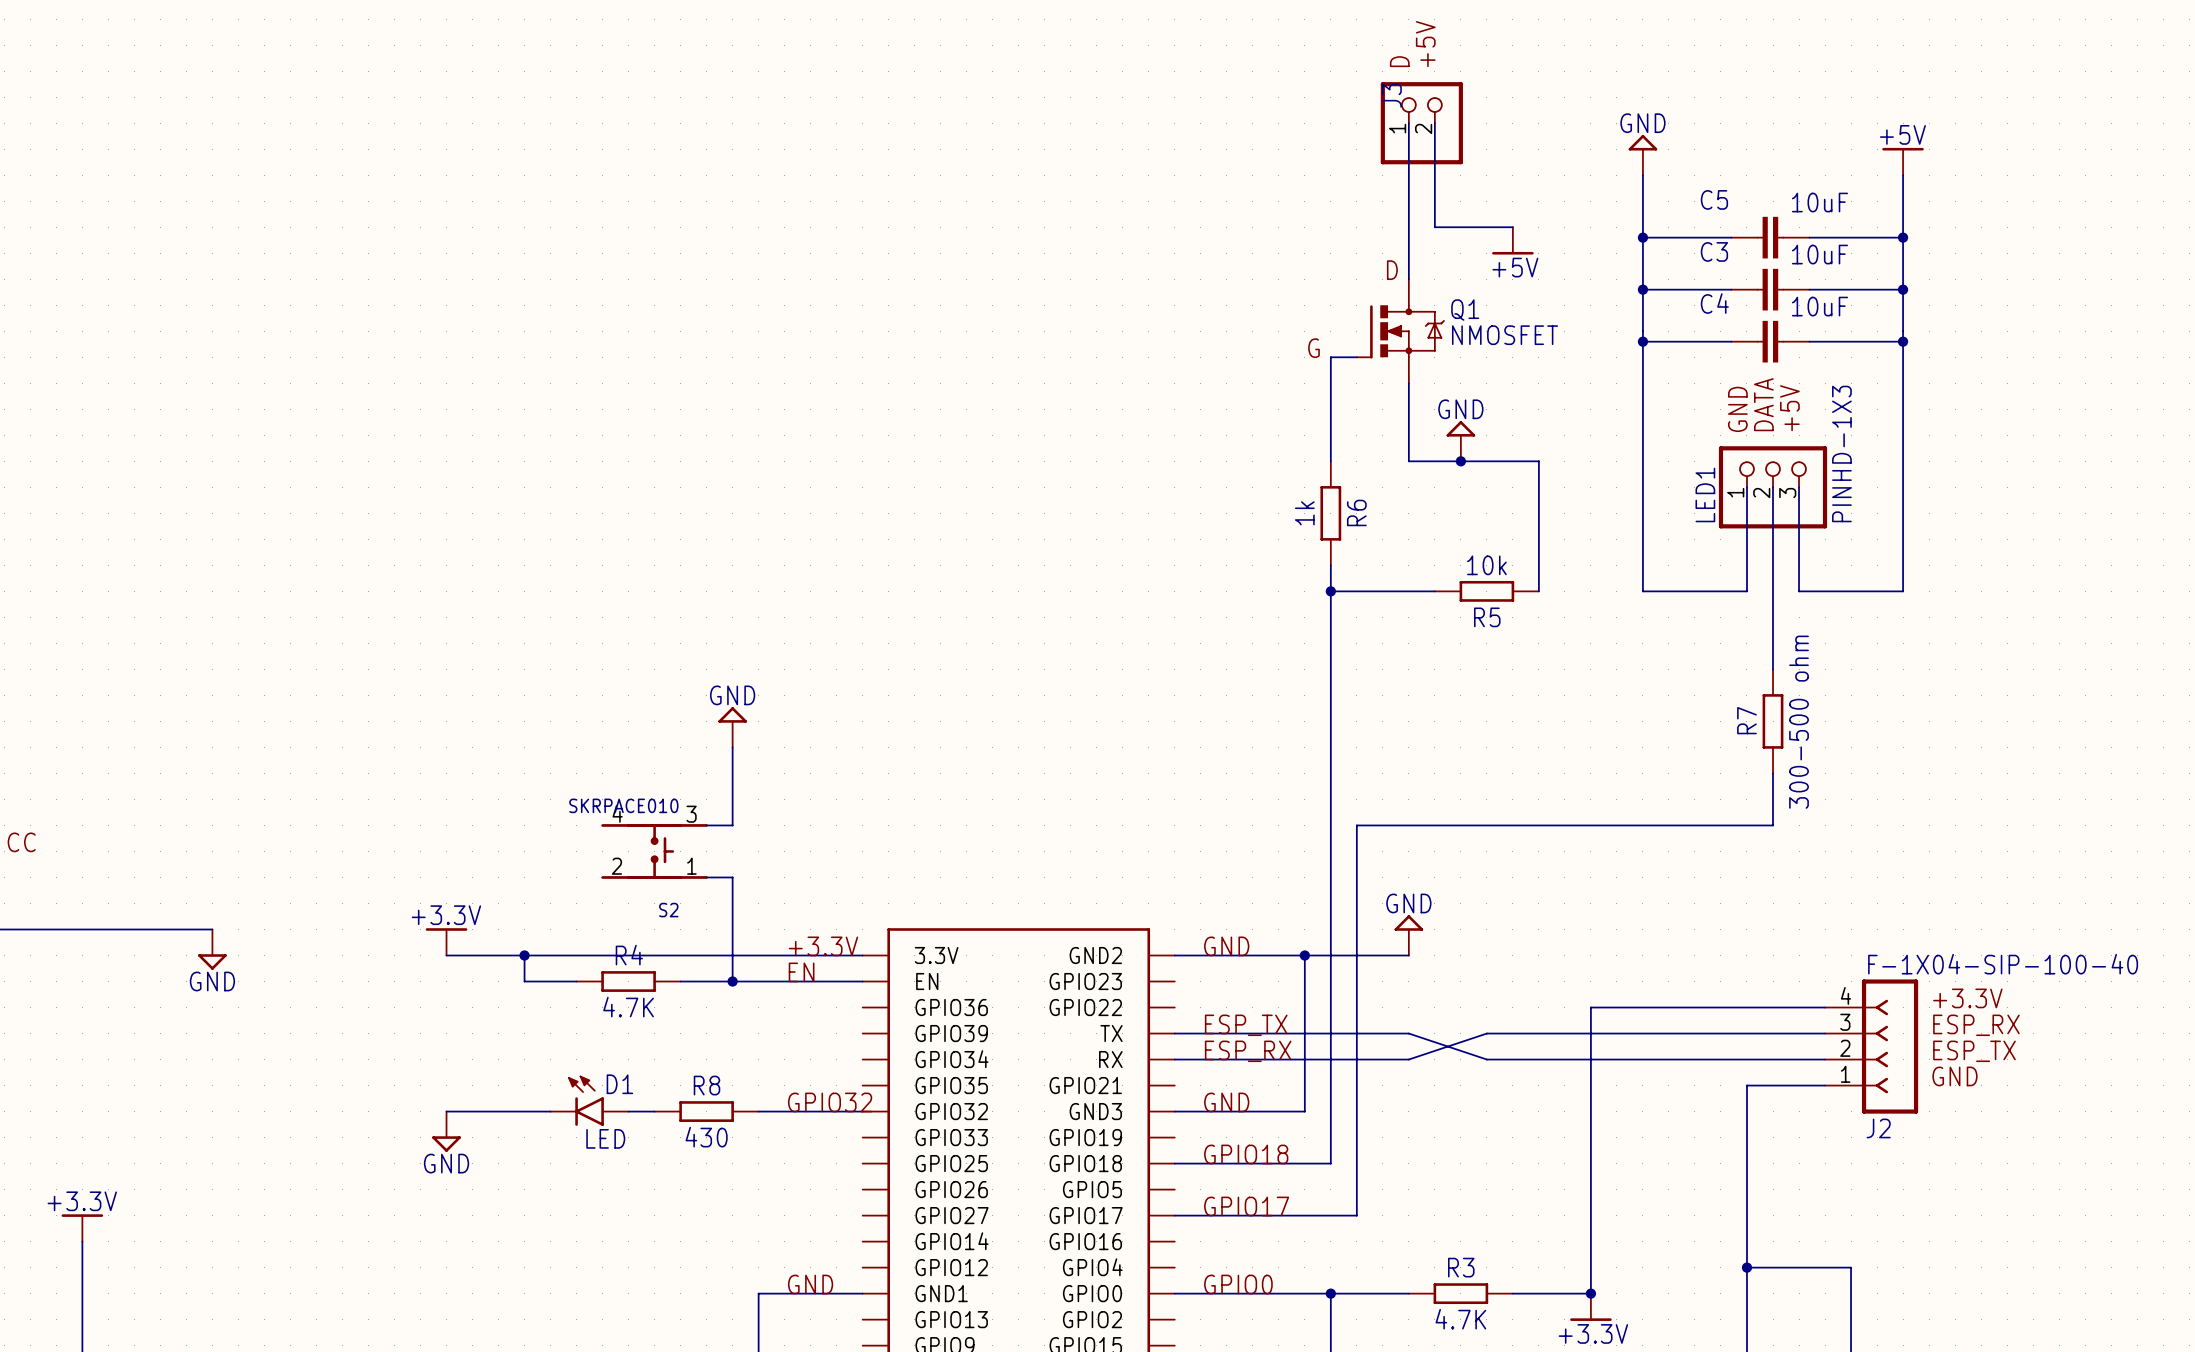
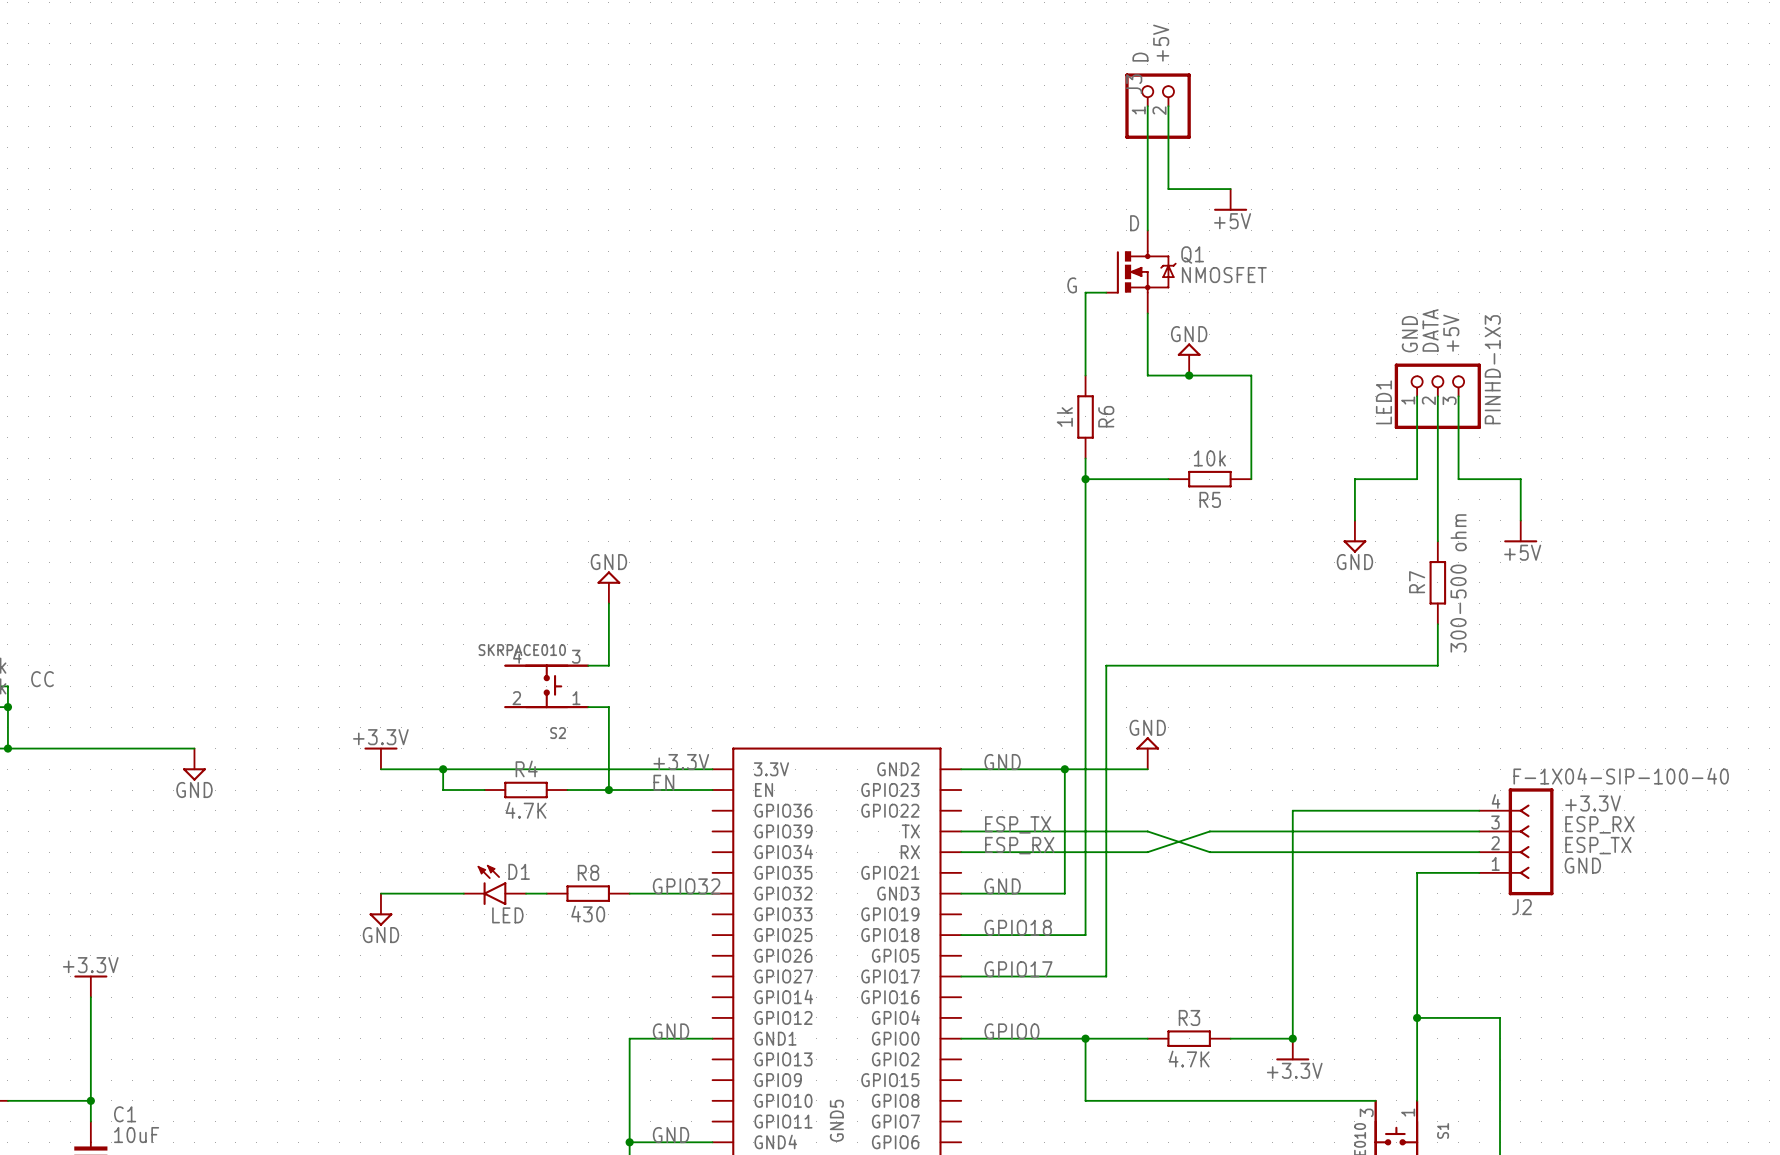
power symbol: GND (1642, 155) -> none
power symbol: +5V (1903, 161) -> none
wire: (1642, 175) (1642, 591) (1668, 591) -> (1354, 520) (1354, 479)
wire: (1903, 175) (1903, 591) (1877, 591) -> (1520, 520) (1520, 479)
wire: (1642, 237) (1731, 237) -> none
junction: (1642, 237) -> none
C5: 10uF (1770, 237) -> none
wire: (1809, 237) (1903, 237) -> none
junction: (1903, 237) -> none
wire: (1642, 289) (1731, 289) -> none
junction: (1642, 289) -> none
C3: 10uF (1770, 289) -> none
wire: (1809, 289) (1903, 289) -> none
junction: (1903, 289) -> none
wire: (1642, 341) (1731, 341) -> none
junction: (1642, 341) -> none
C4: 10uF (1770, 341) -> none
wire: (1809, 341) (1903, 341) -> none
junction: (1903, 341) -> none
power symbol: none -> +5V (1520, 531)
power symbol: none -> GND (1354, 536)

